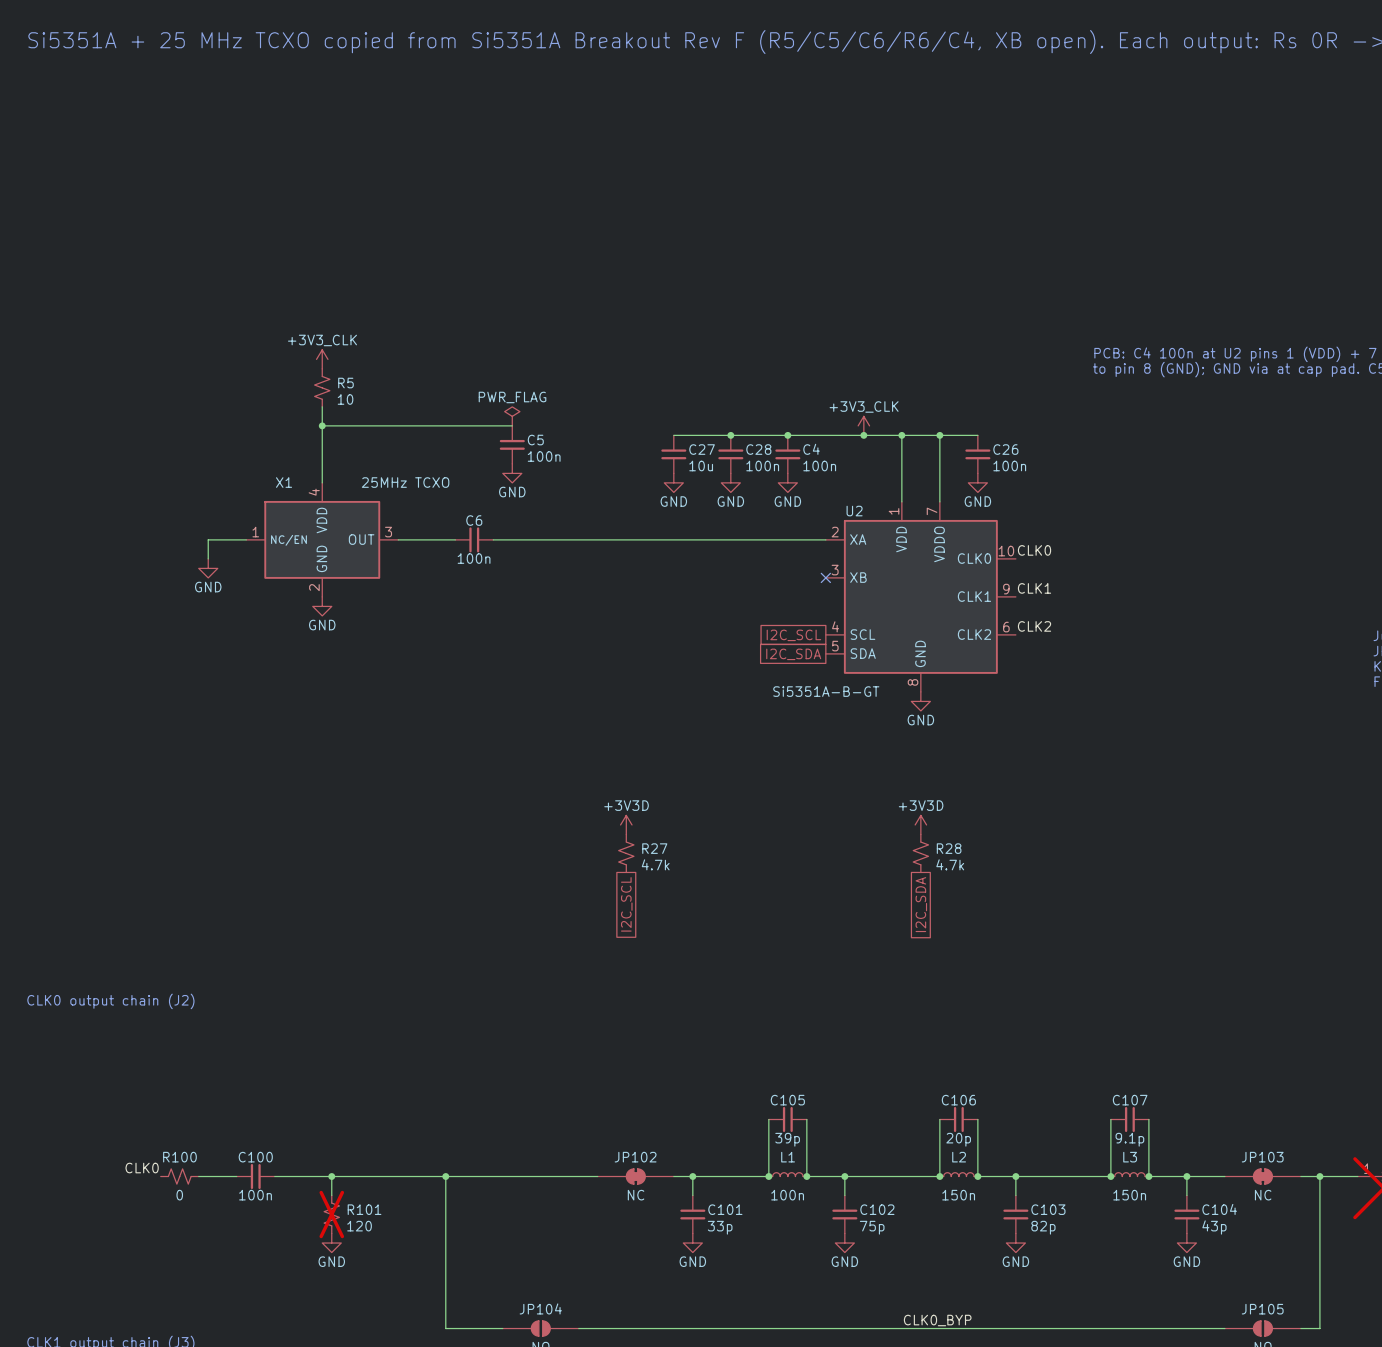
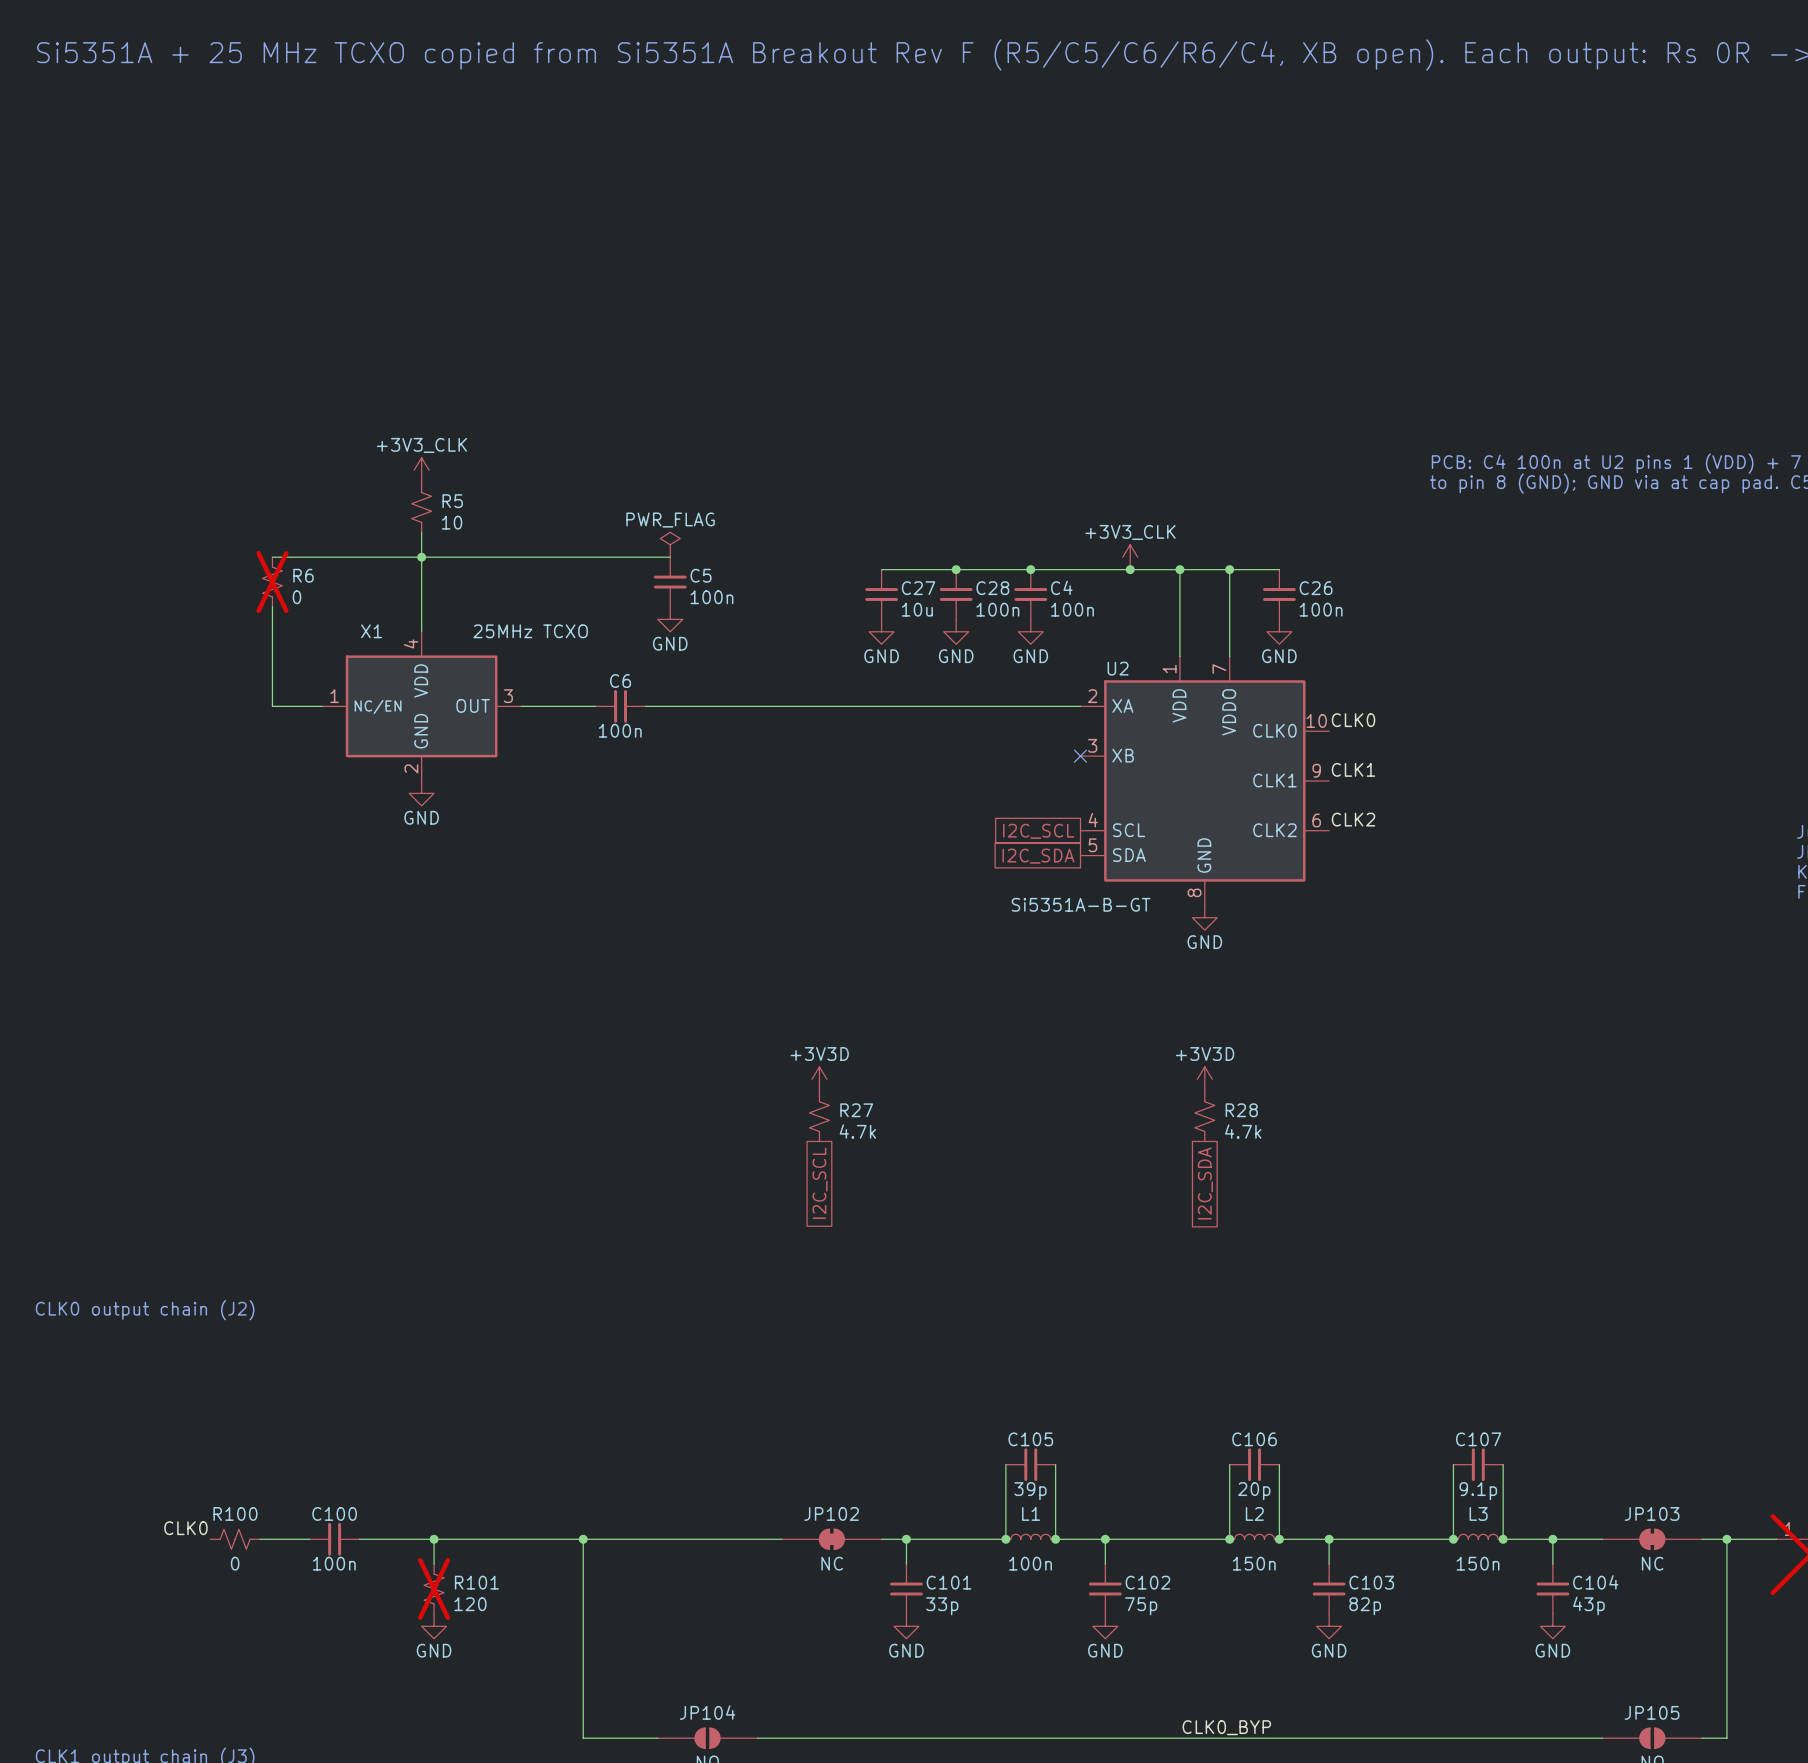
wire: none -> (272, 557) (421, 557)
R6: none -> 0 (272, 582)
wire: (208, 539) (208, 558) -> (272, 706) (272, 606)
power symbol: GND (208, 568) -> none

